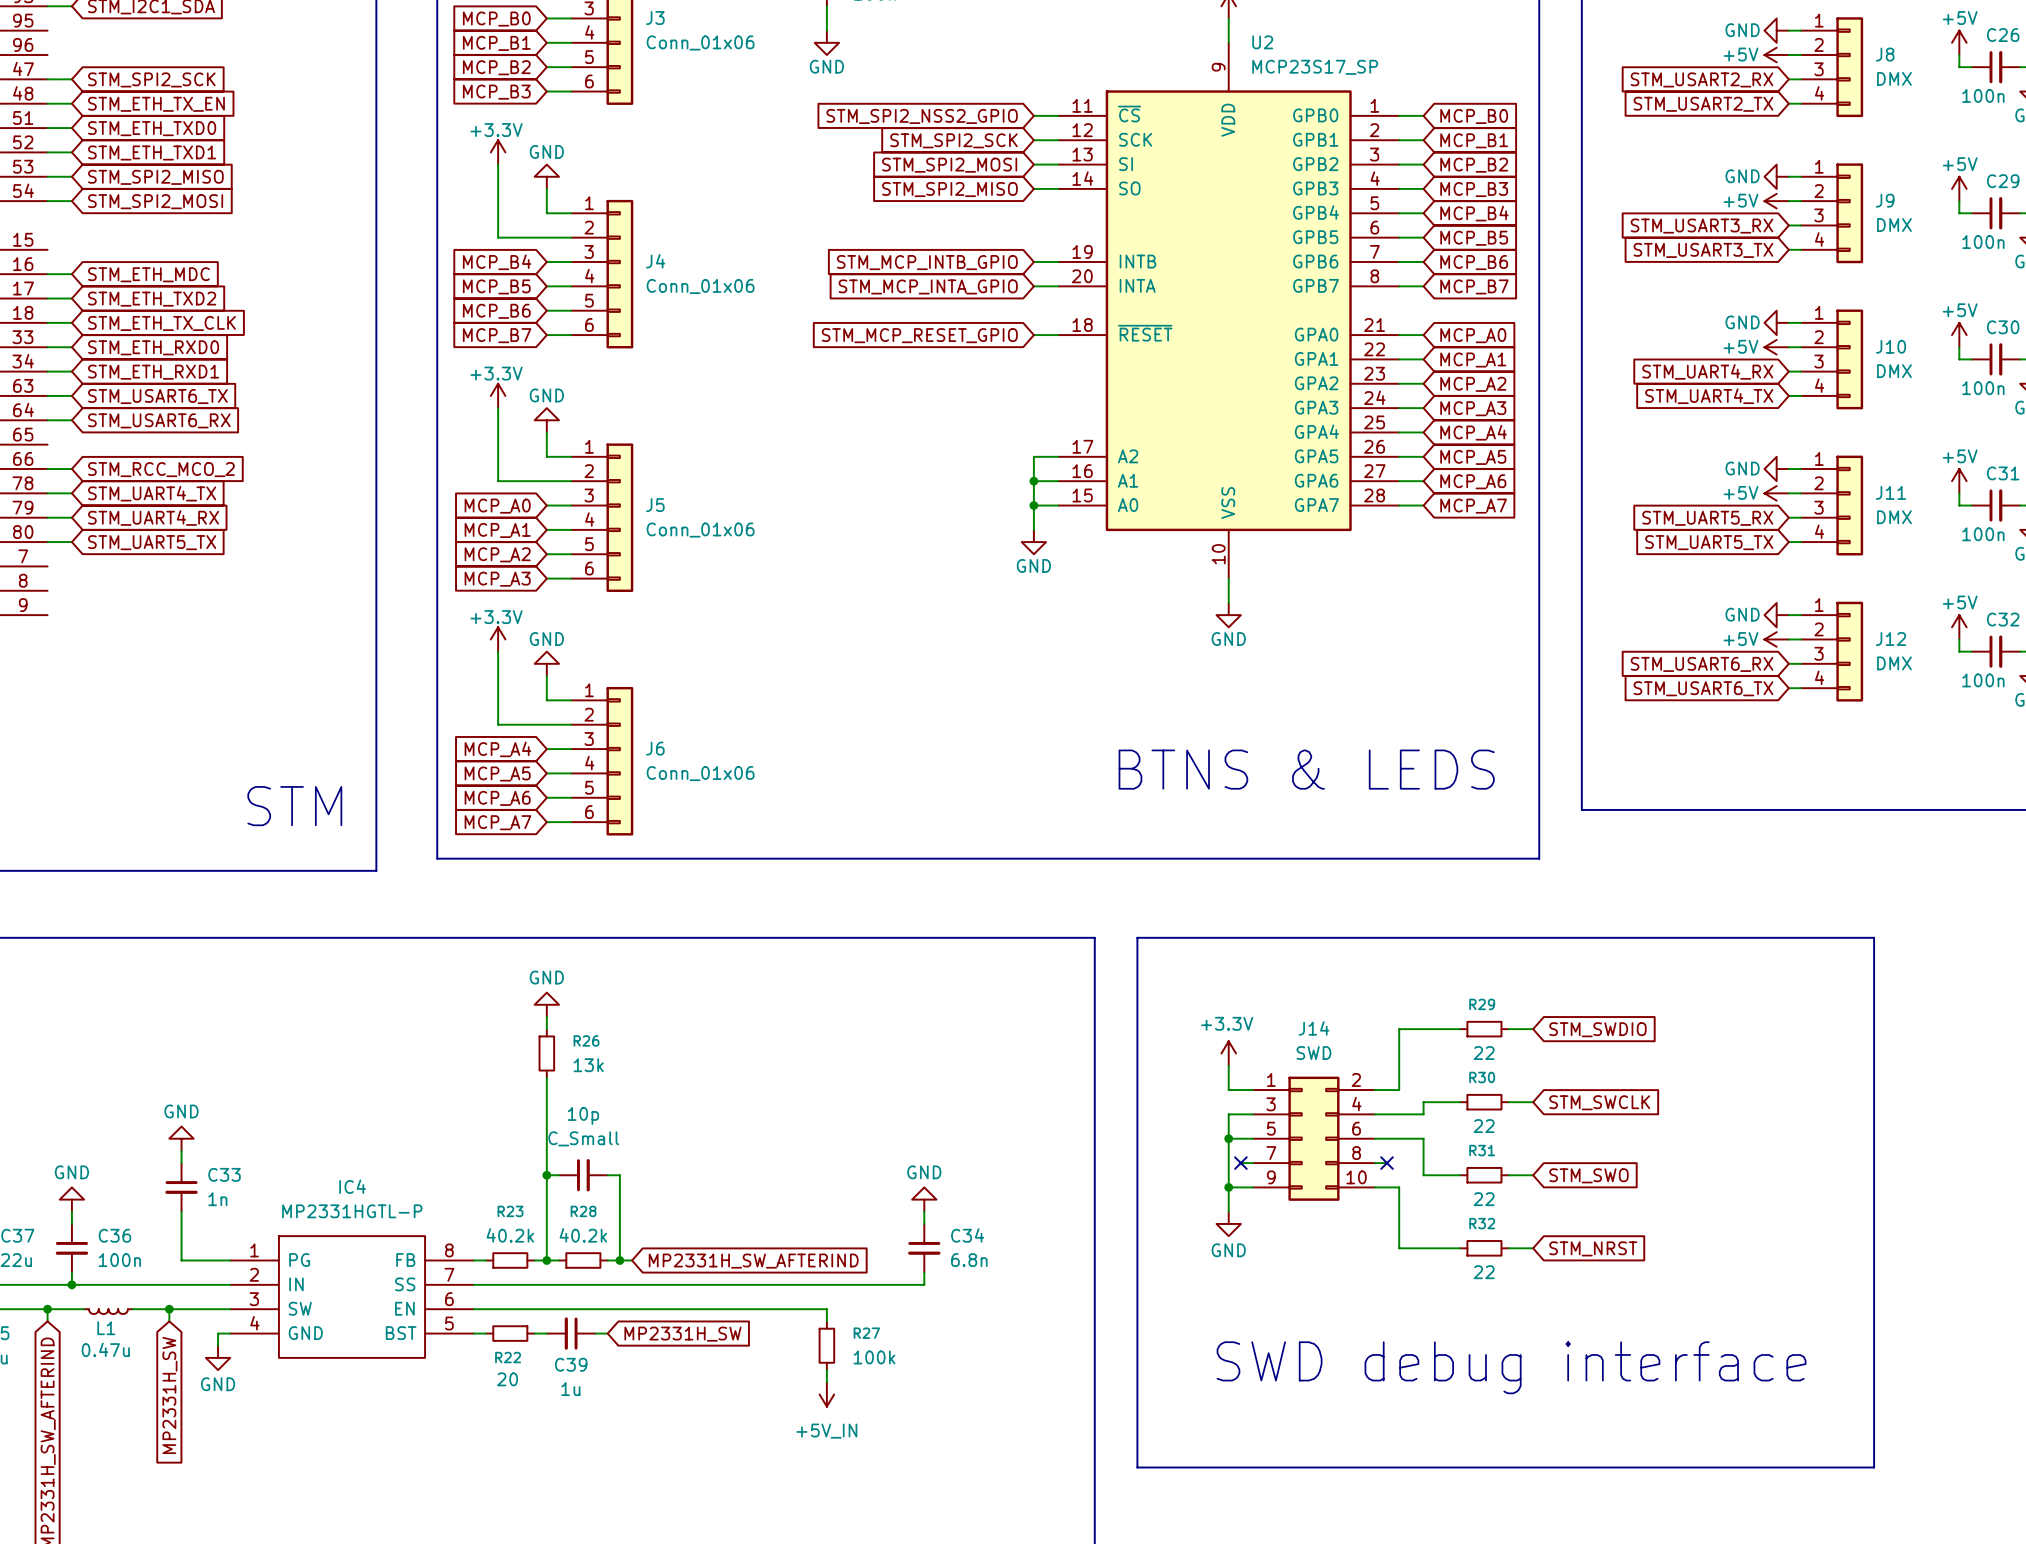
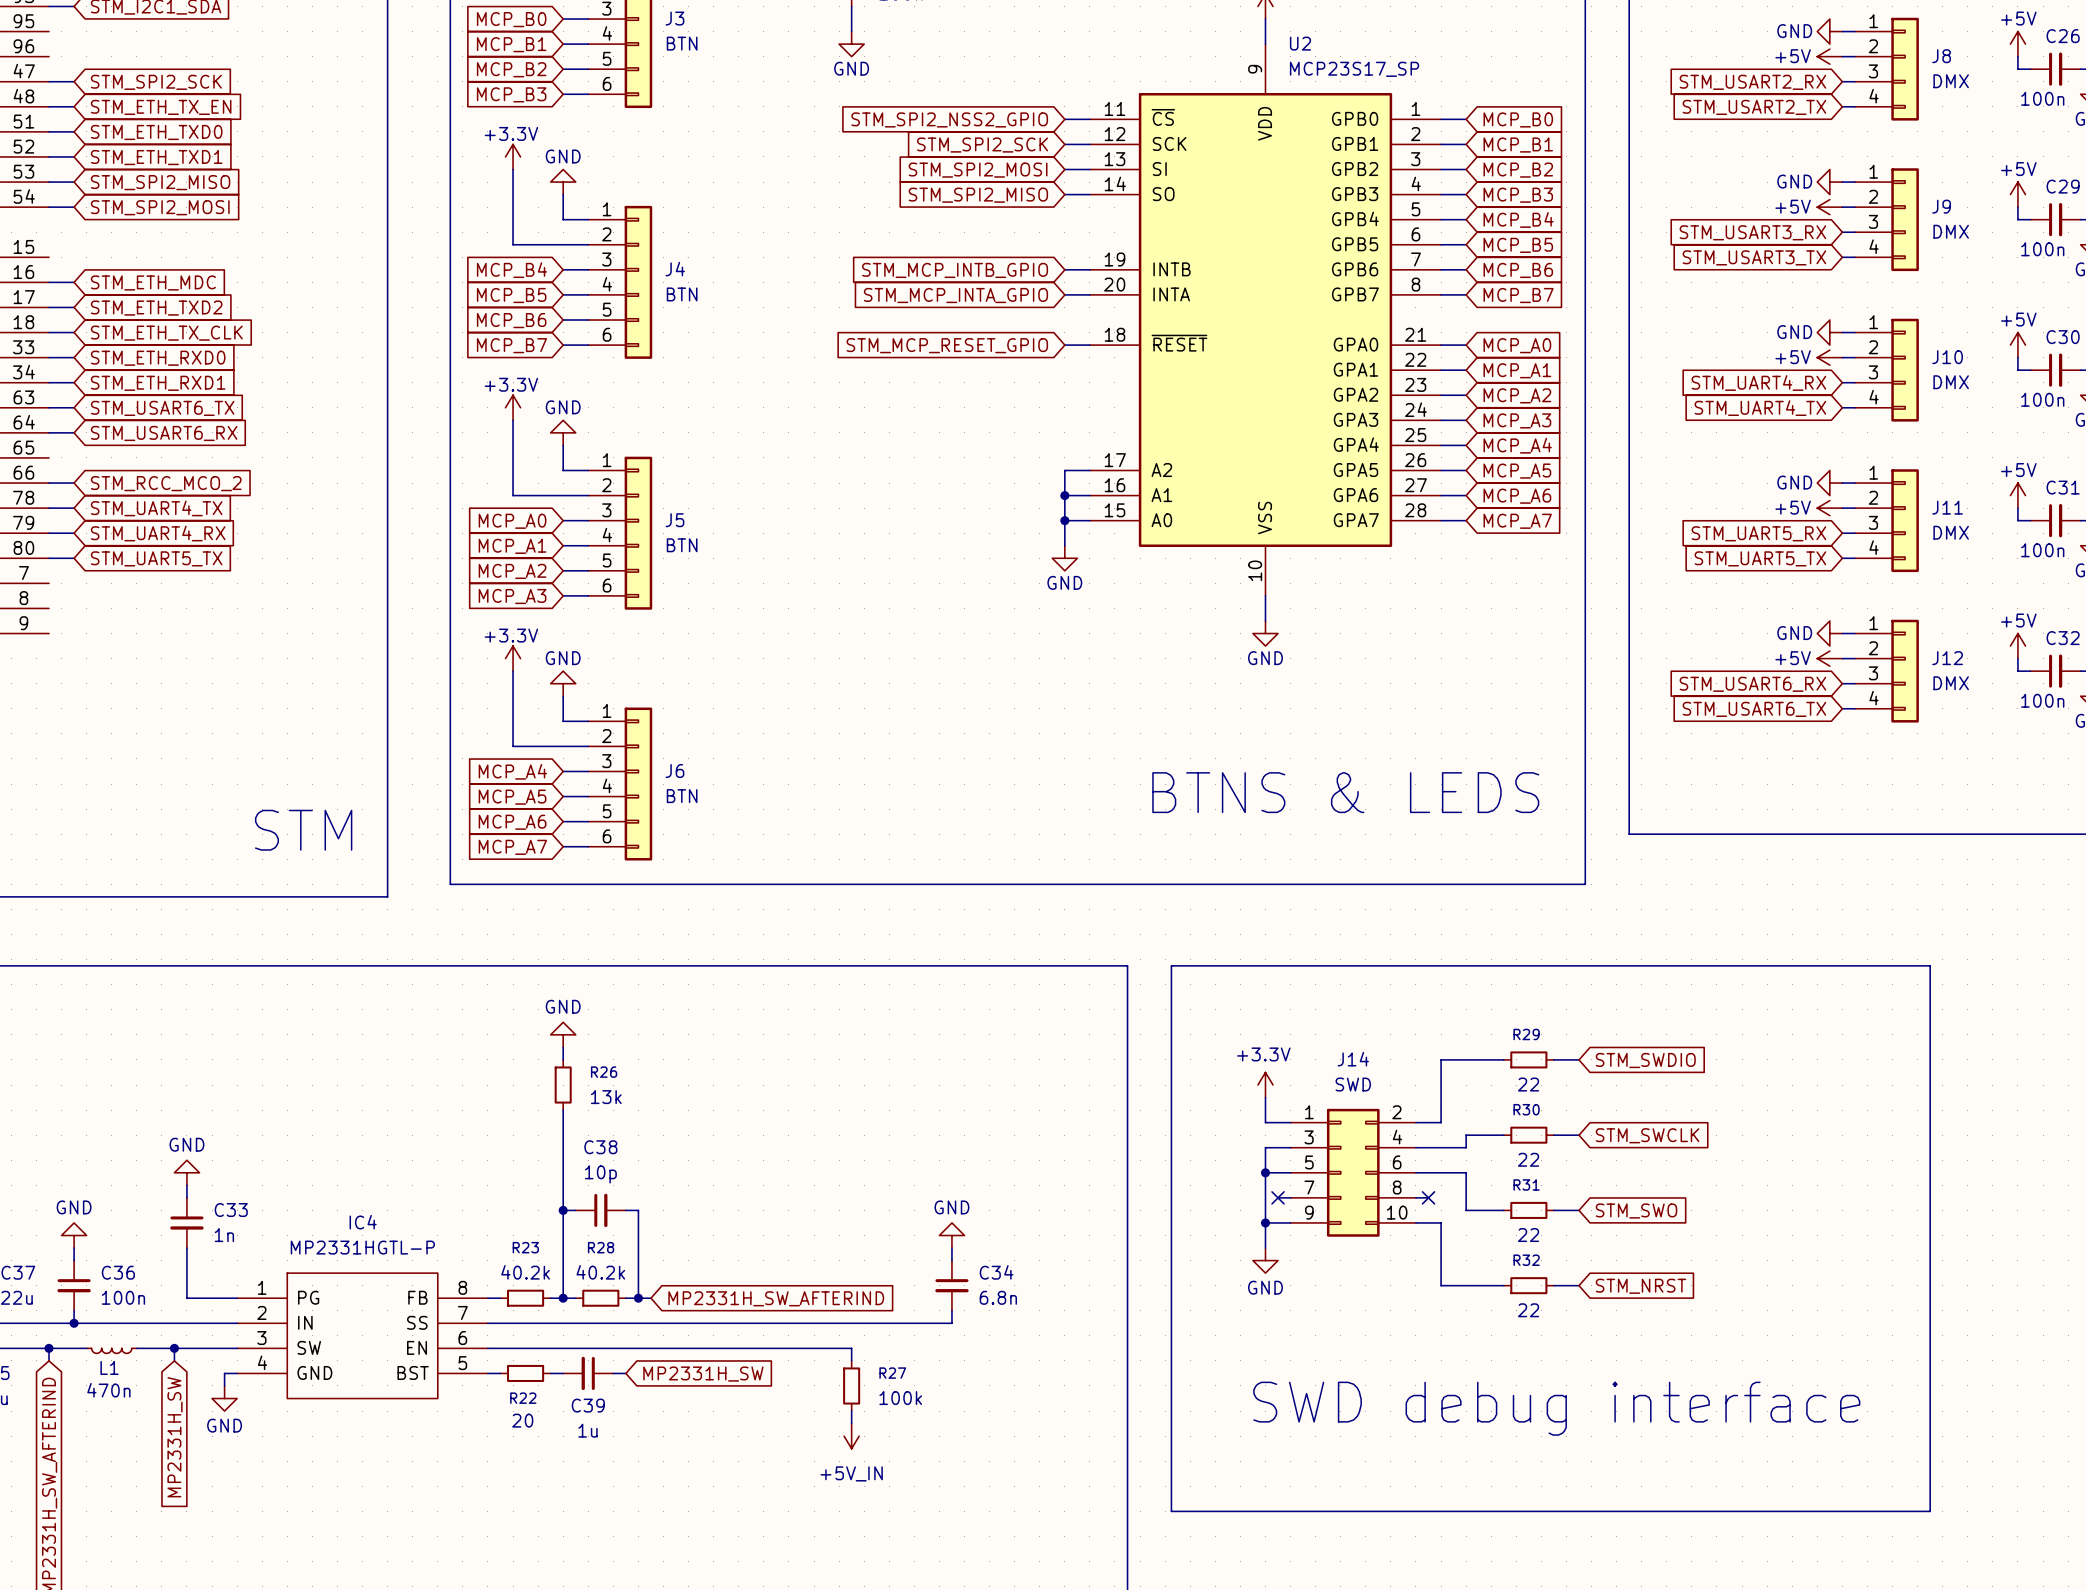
J3 value: Conn_01x06 (700, 42) -> BTN (682, 43)
J4 value: Conn_01x06 (700, 286) -> BTN (682, 294)
J5 value: Conn_01x06 (700, 530) -> BTN (682, 545)
J6 value: Conn_01x06 (700, 773) -> BTN (682, 796)
10p name: 10p (583, 1115) -> C38 (600, 1147)
10p value: C_Small (583, 1138) -> 10p (600, 1174)
L1 value: 0.47u (105, 1349) -> 470n (108, 1390)

